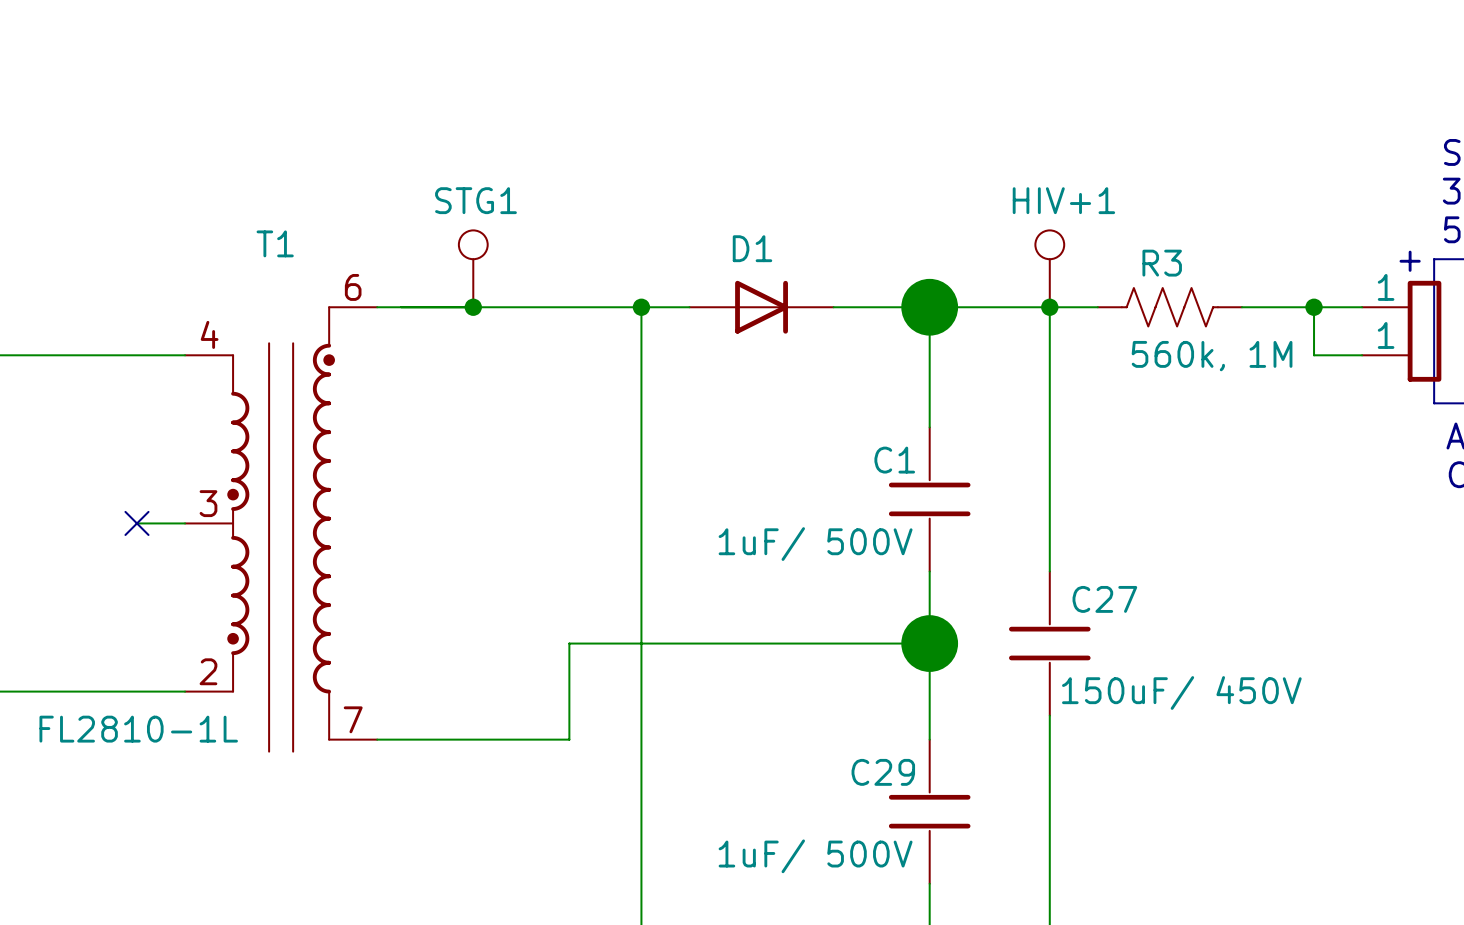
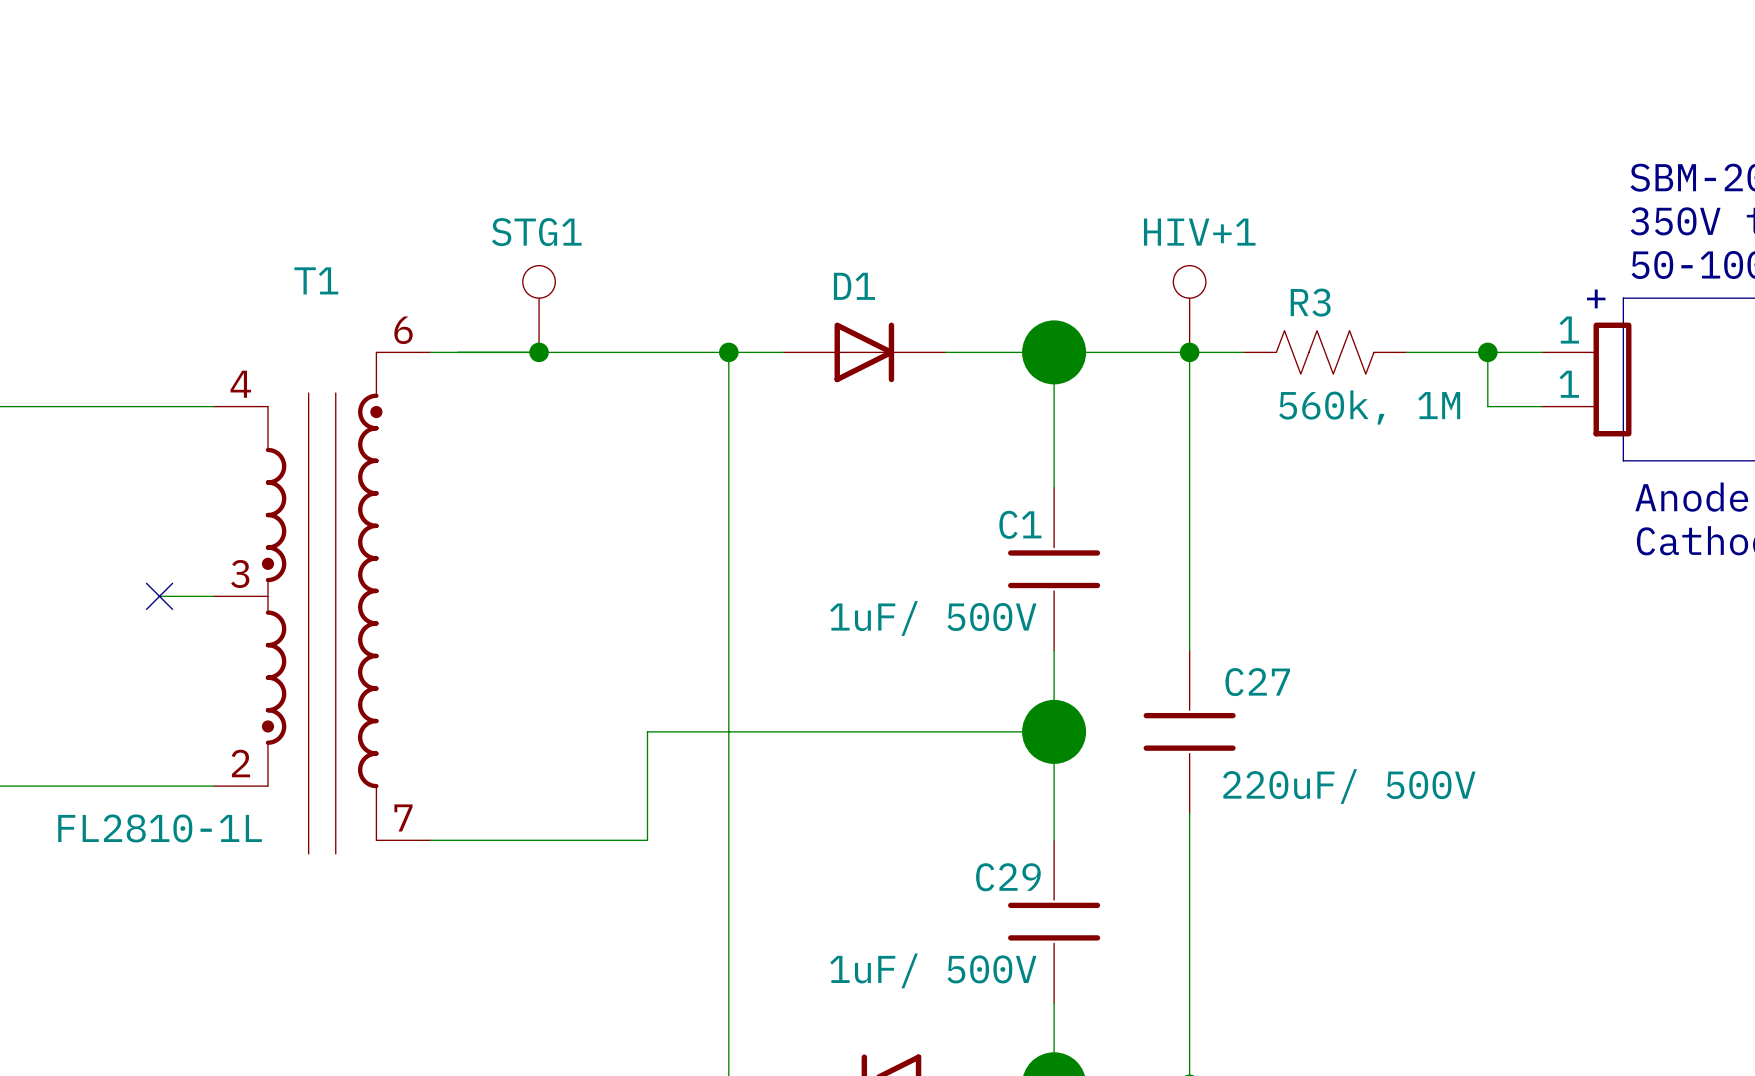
C27 value: 150uF/ 450V (1181, 692) -> 220uF/ 500V (1349, 786)

